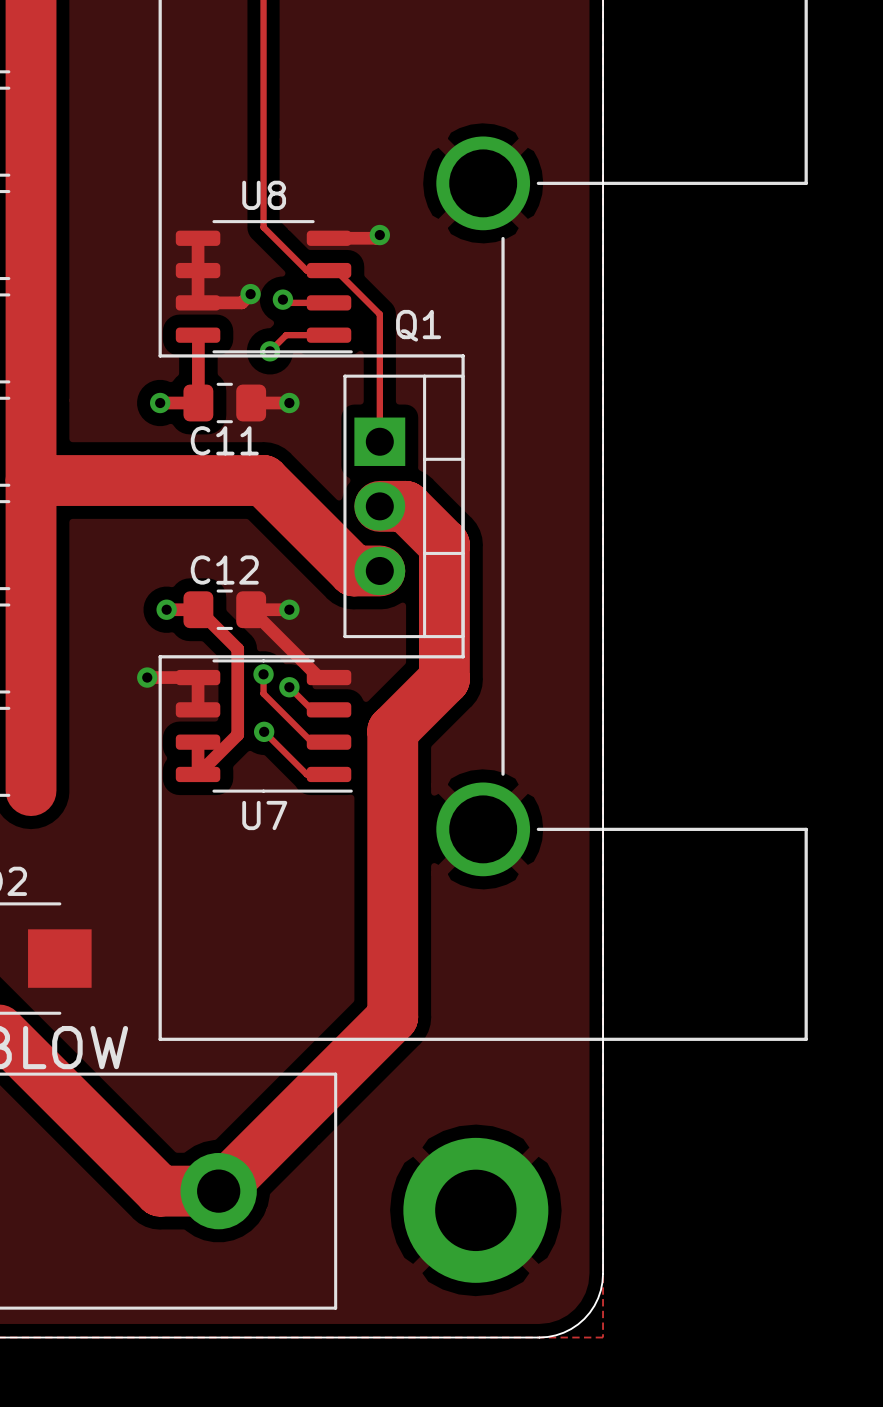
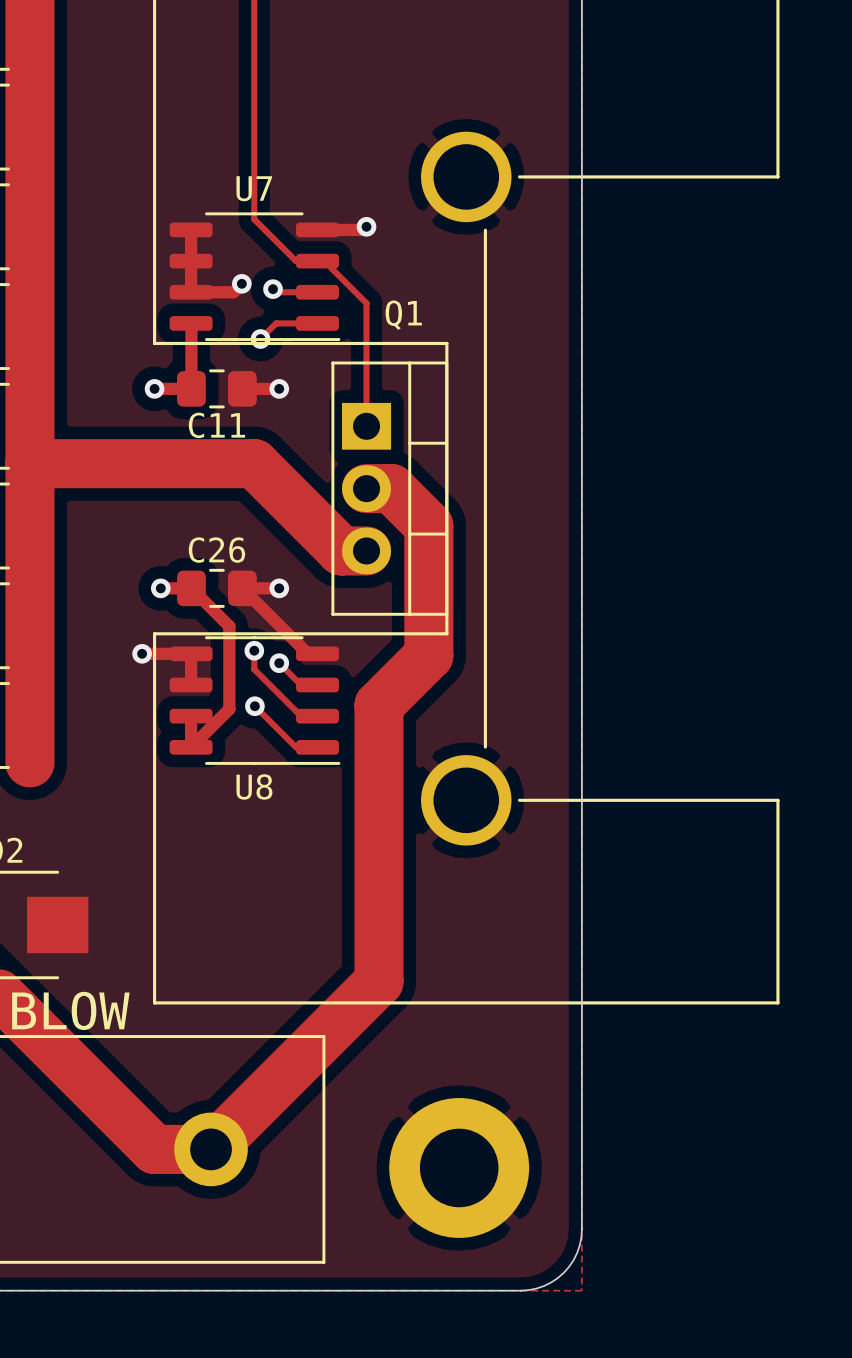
U8 name: U8 (264, 195) -> U7 (254, 188)
C12 name: C12 (224, 570) -> C26 (216, 550)
U7 name: U7 (264, 815) -> U8 (254, 786)

